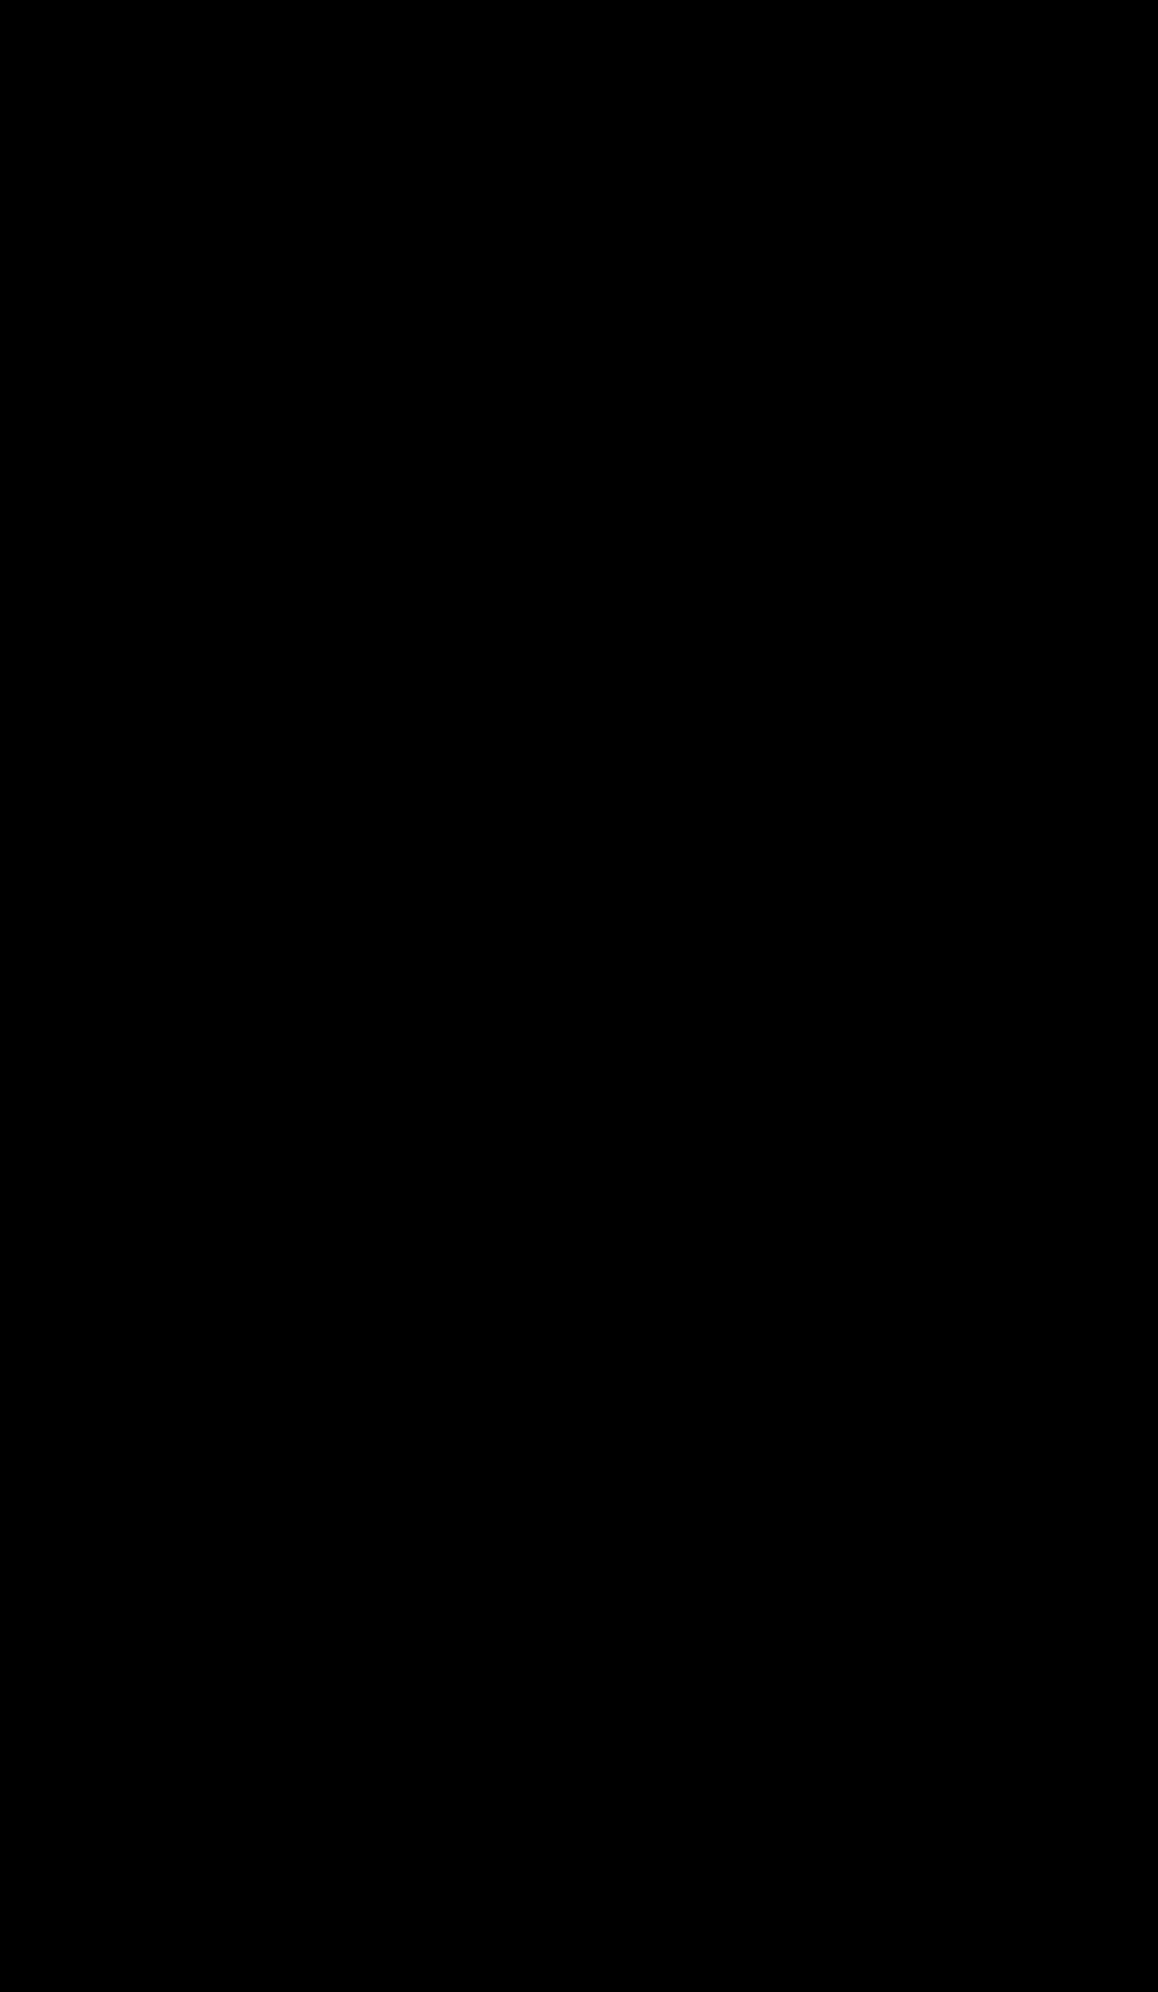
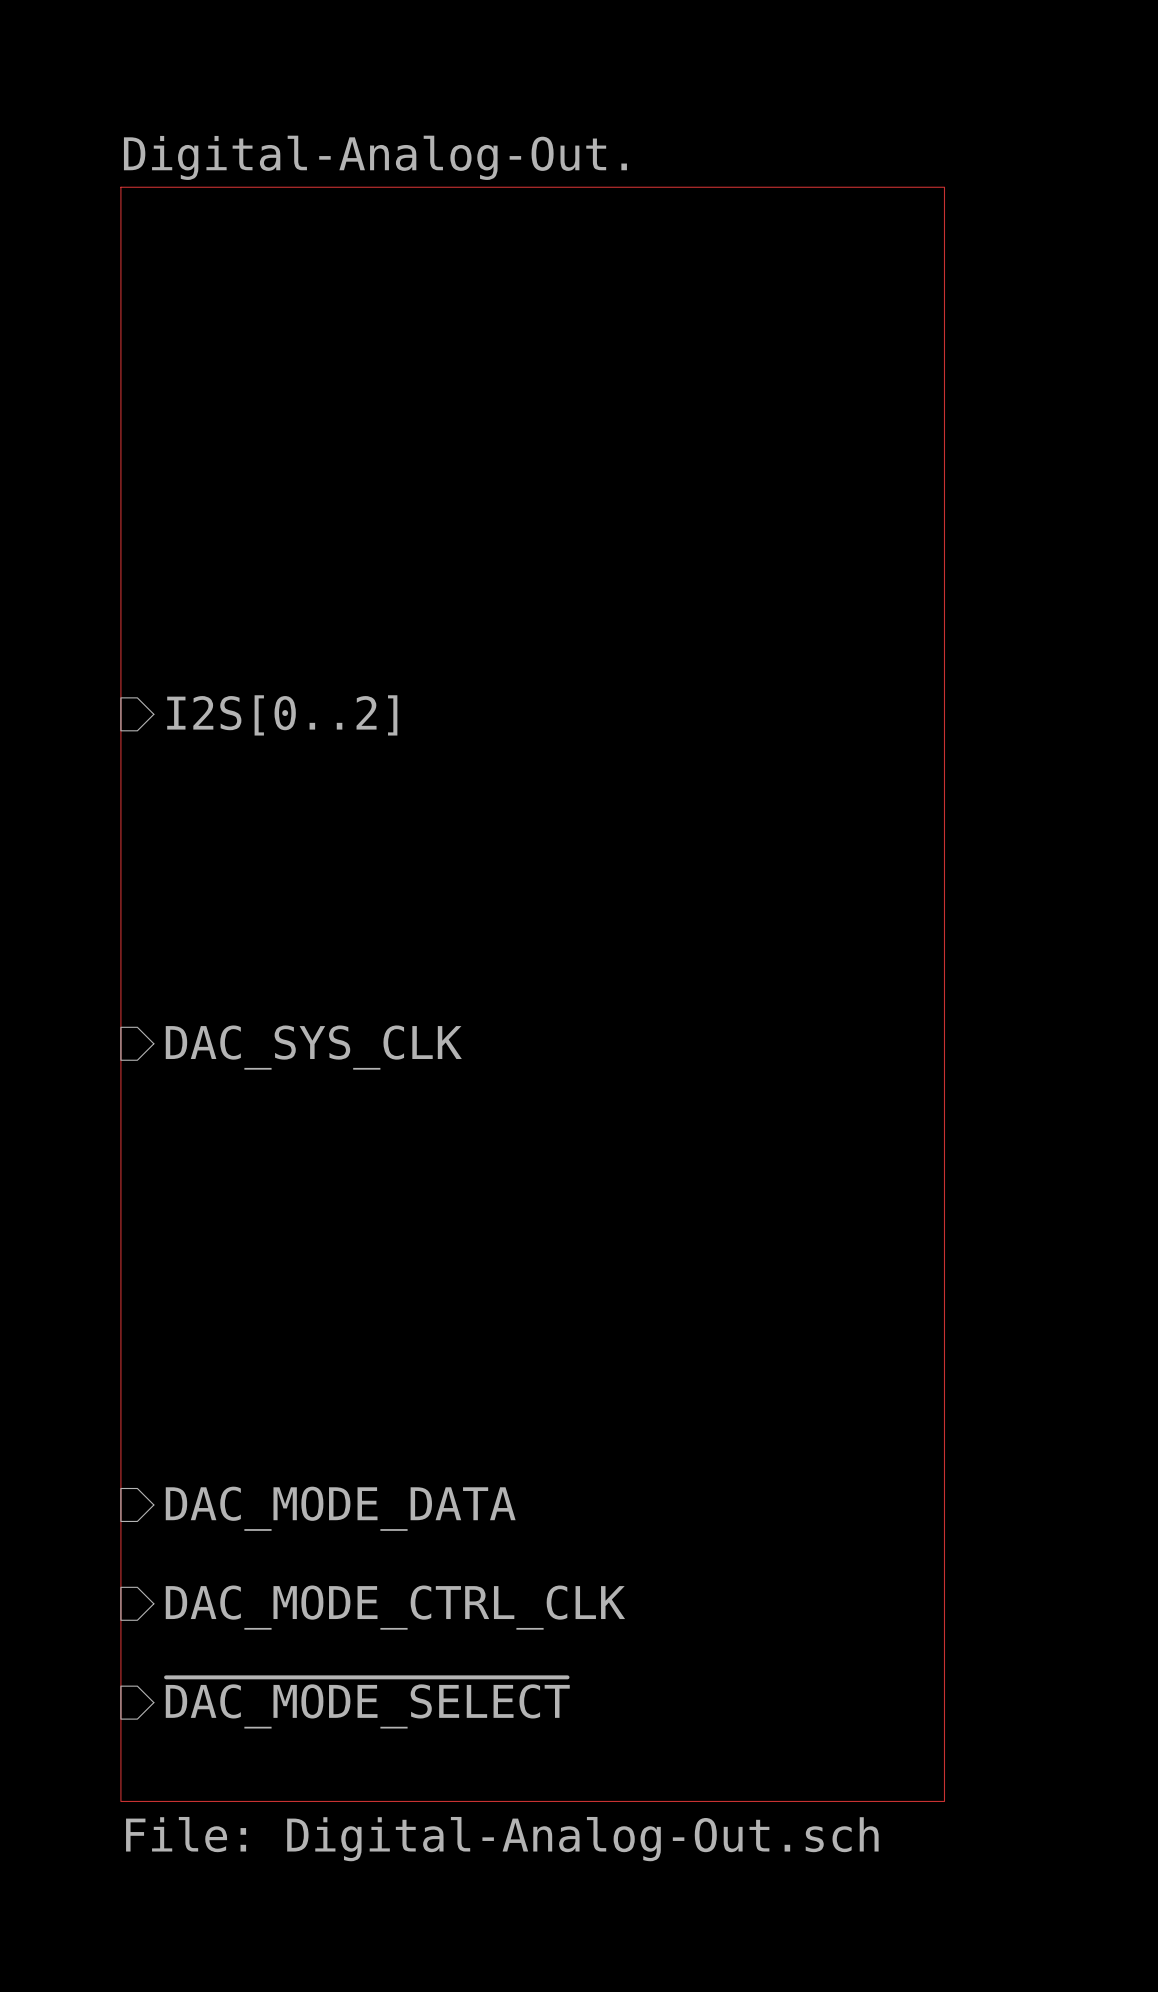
sheet pin: none -> I2S[0..2] (282, 715)
sheet Digital-Analog-Out.: none -> File: Digital-Analog-Out.sch (532, 994)
sheet pin: none -> DAC_SYS_CLK (313, 1047)
sheet pin: none -> DAC_MODE_DATA (340, 1508)
sheet pin: none -> DAC_MODE_CTRL_CLK (395, 1607)
sheet pin: none -> ~{DAC_MODE_SELECT} (367, 1702)

